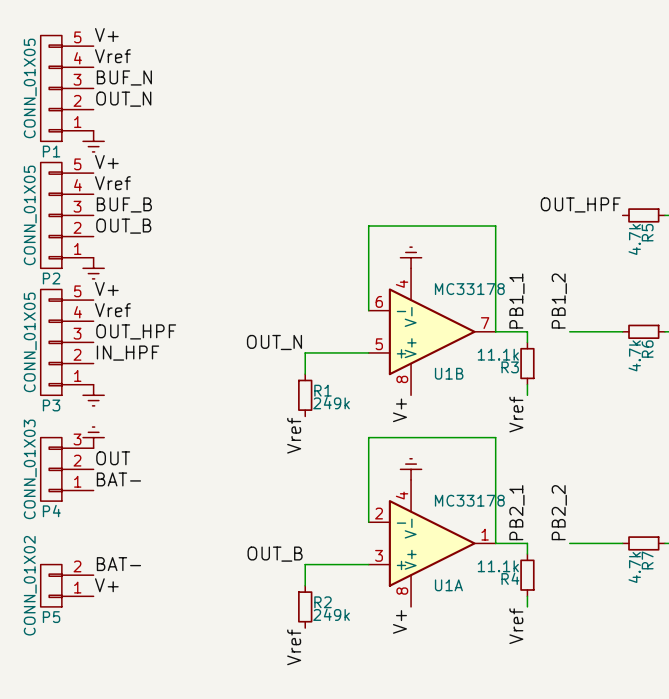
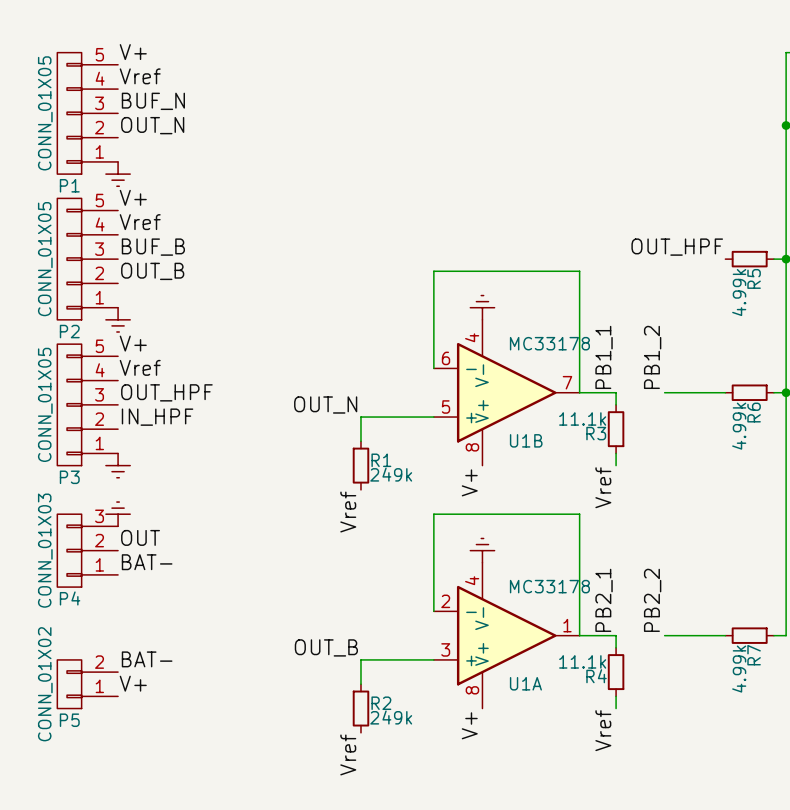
R5 value: 4.7k (634, 239) -> 4.99k (739, 292)
R6 value: 4.7k (634, 355) -> 4.99k (739, 426)
R7 value: 4.7k (634, 567) -> 4.99k (739, 669)

